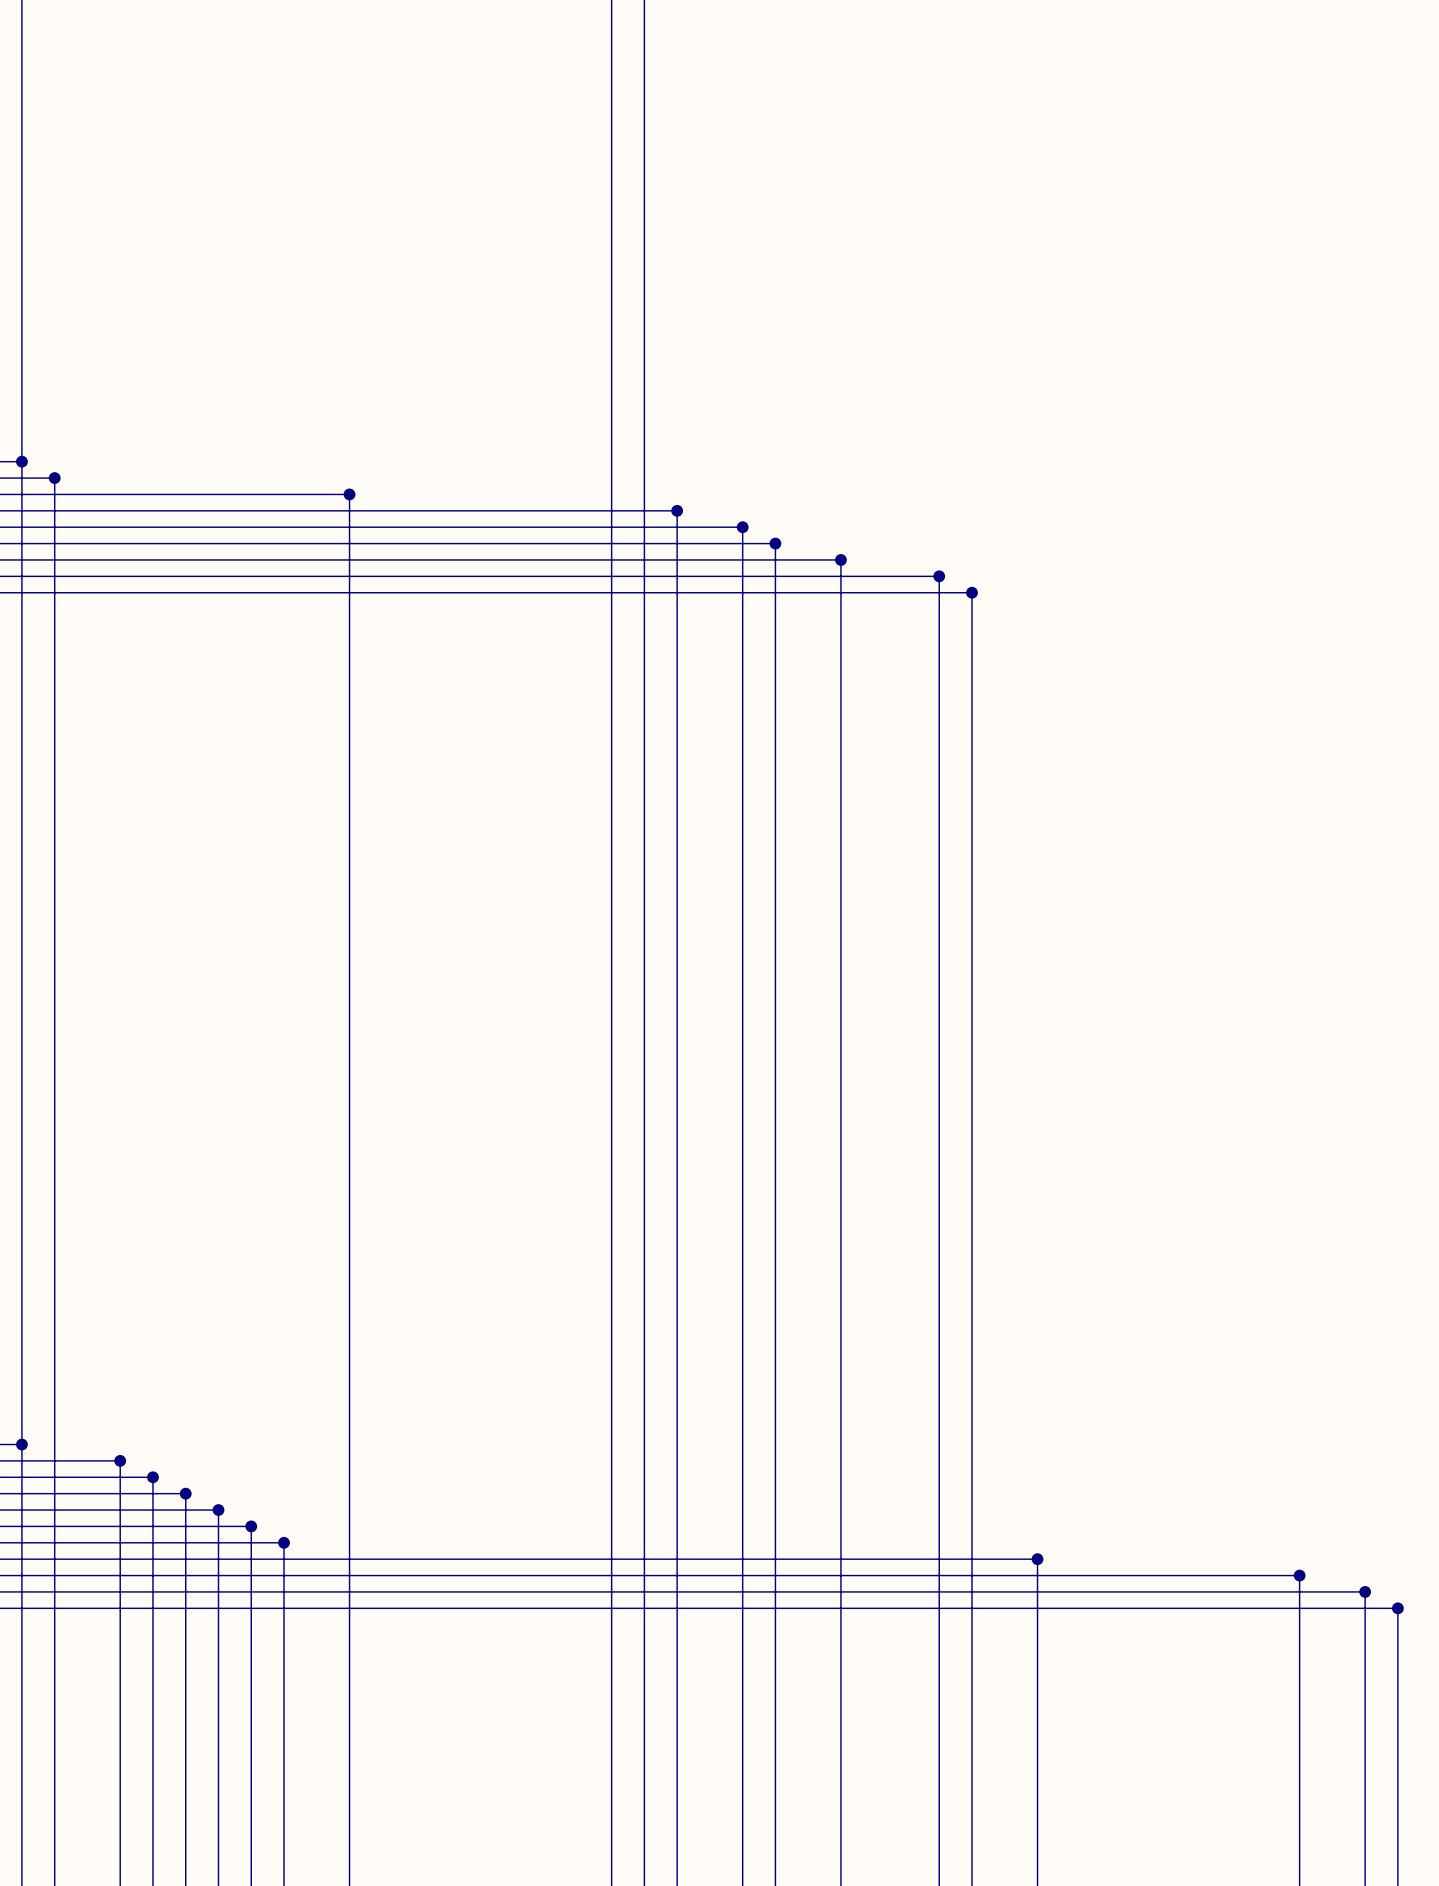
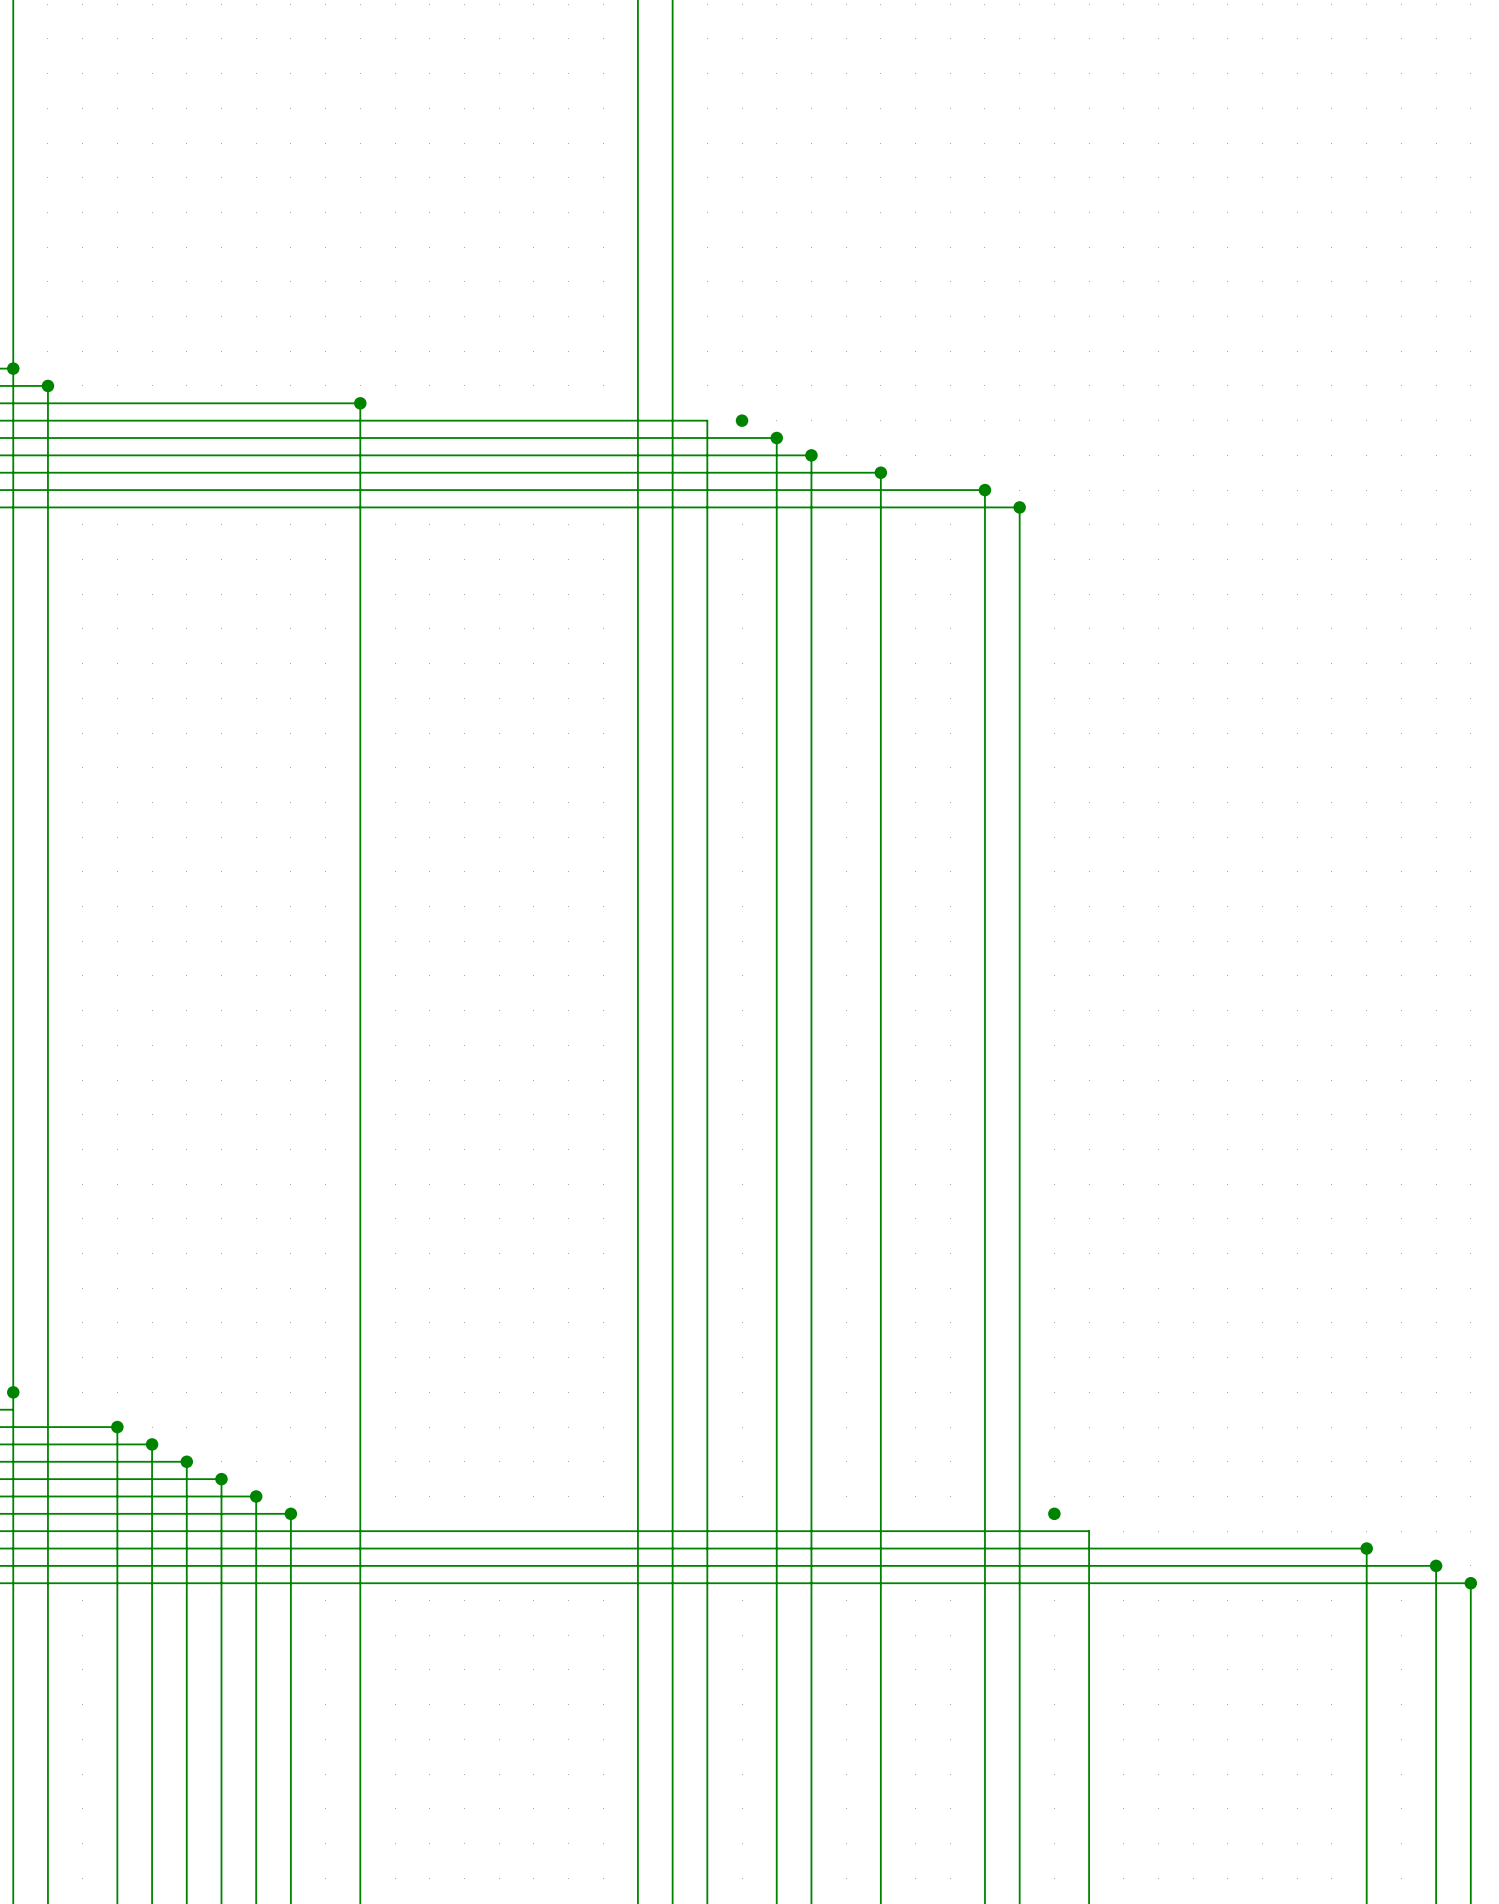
junction position: (677, 510) -> (742, 420)
junction position: (21, 1444) -> (13, 1392)
junction position: (1037, 1559) -> (1054, 1513)

